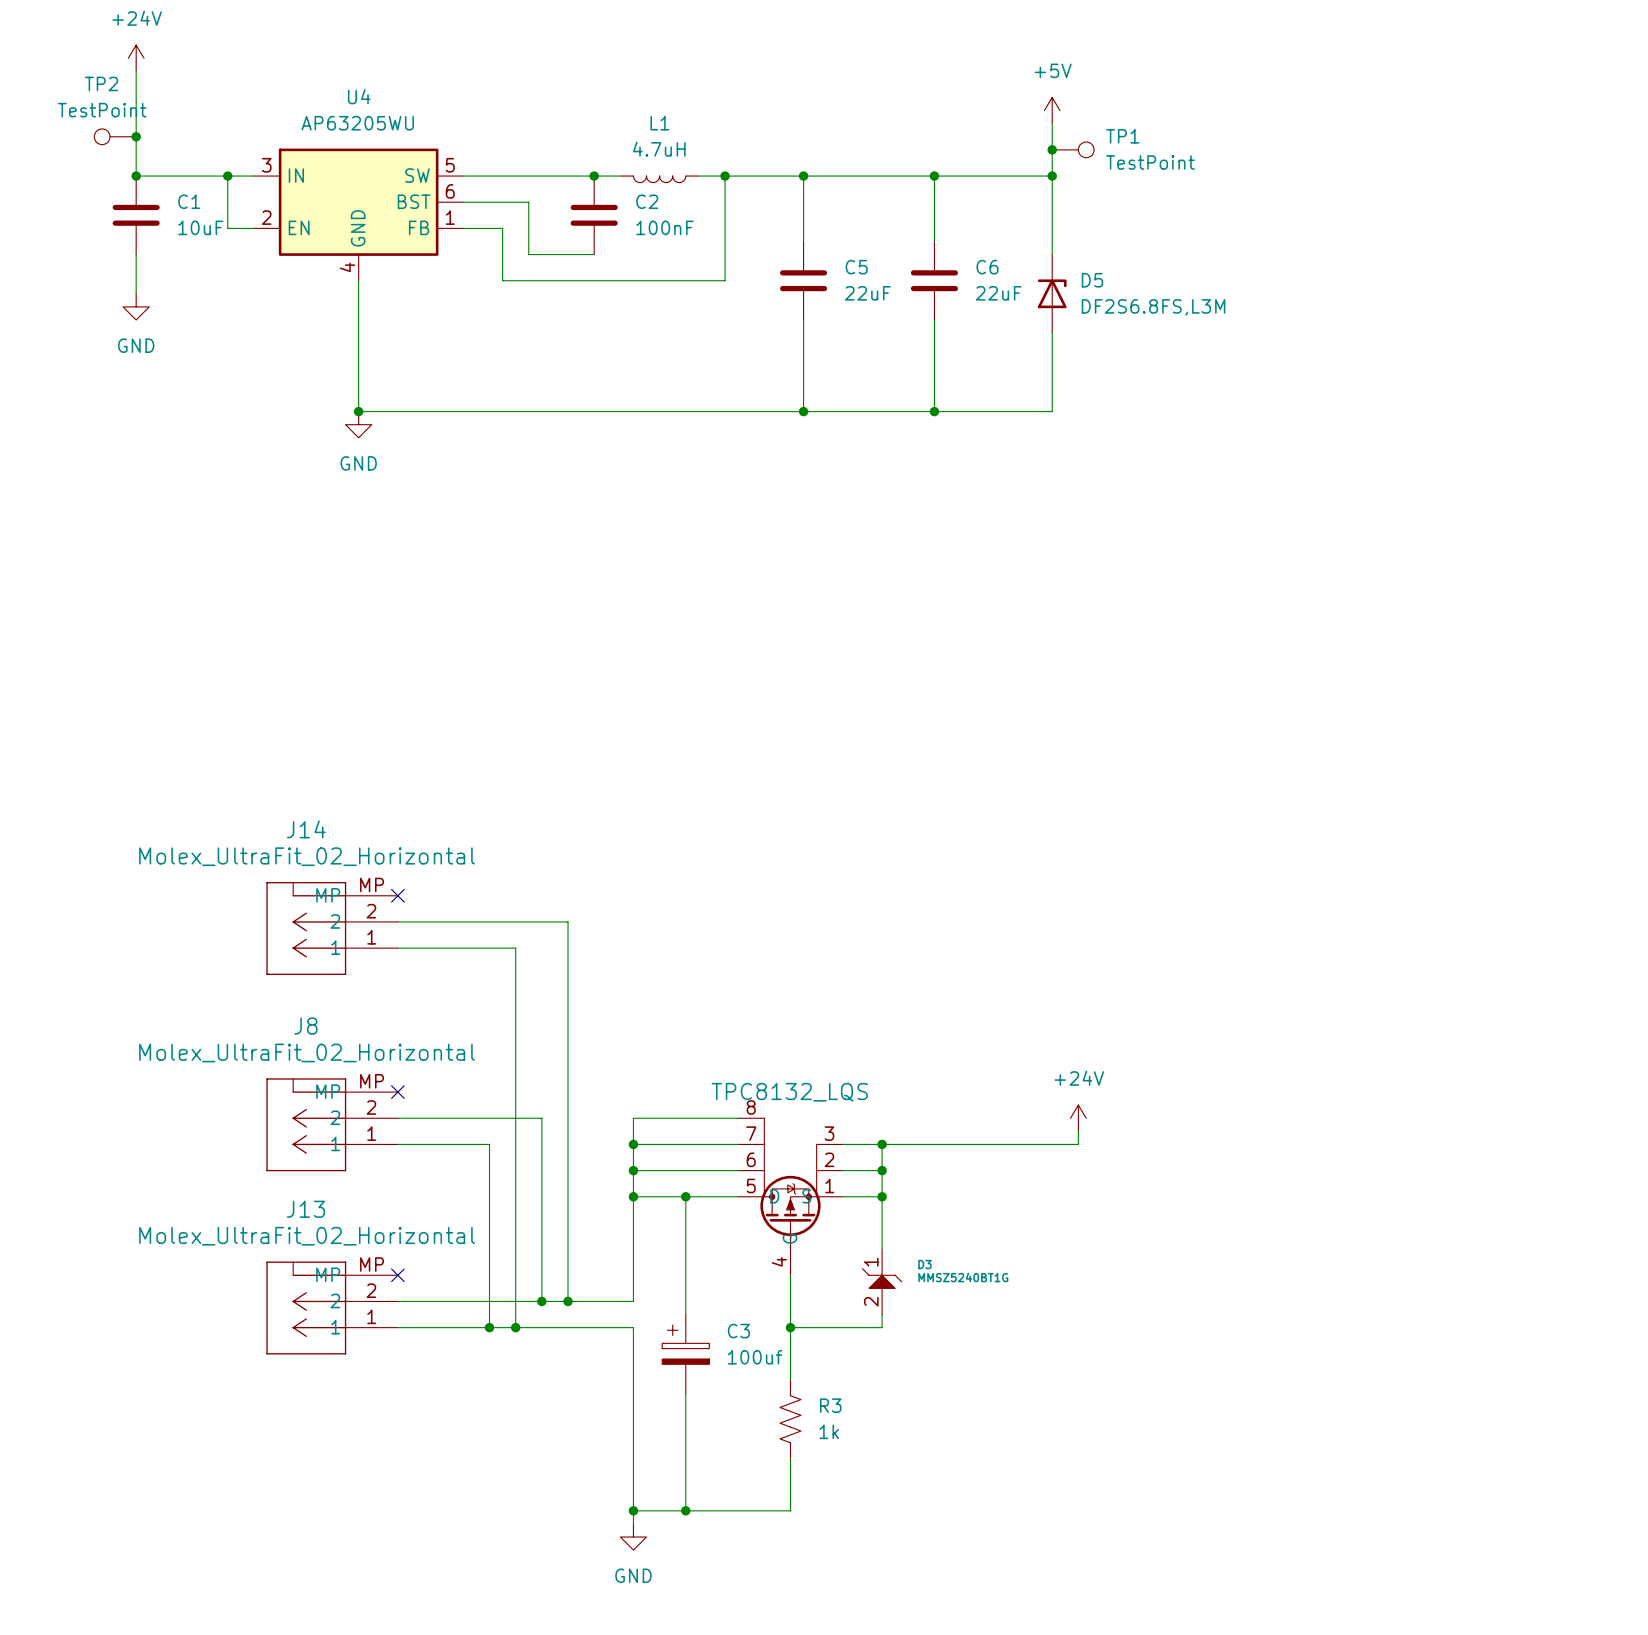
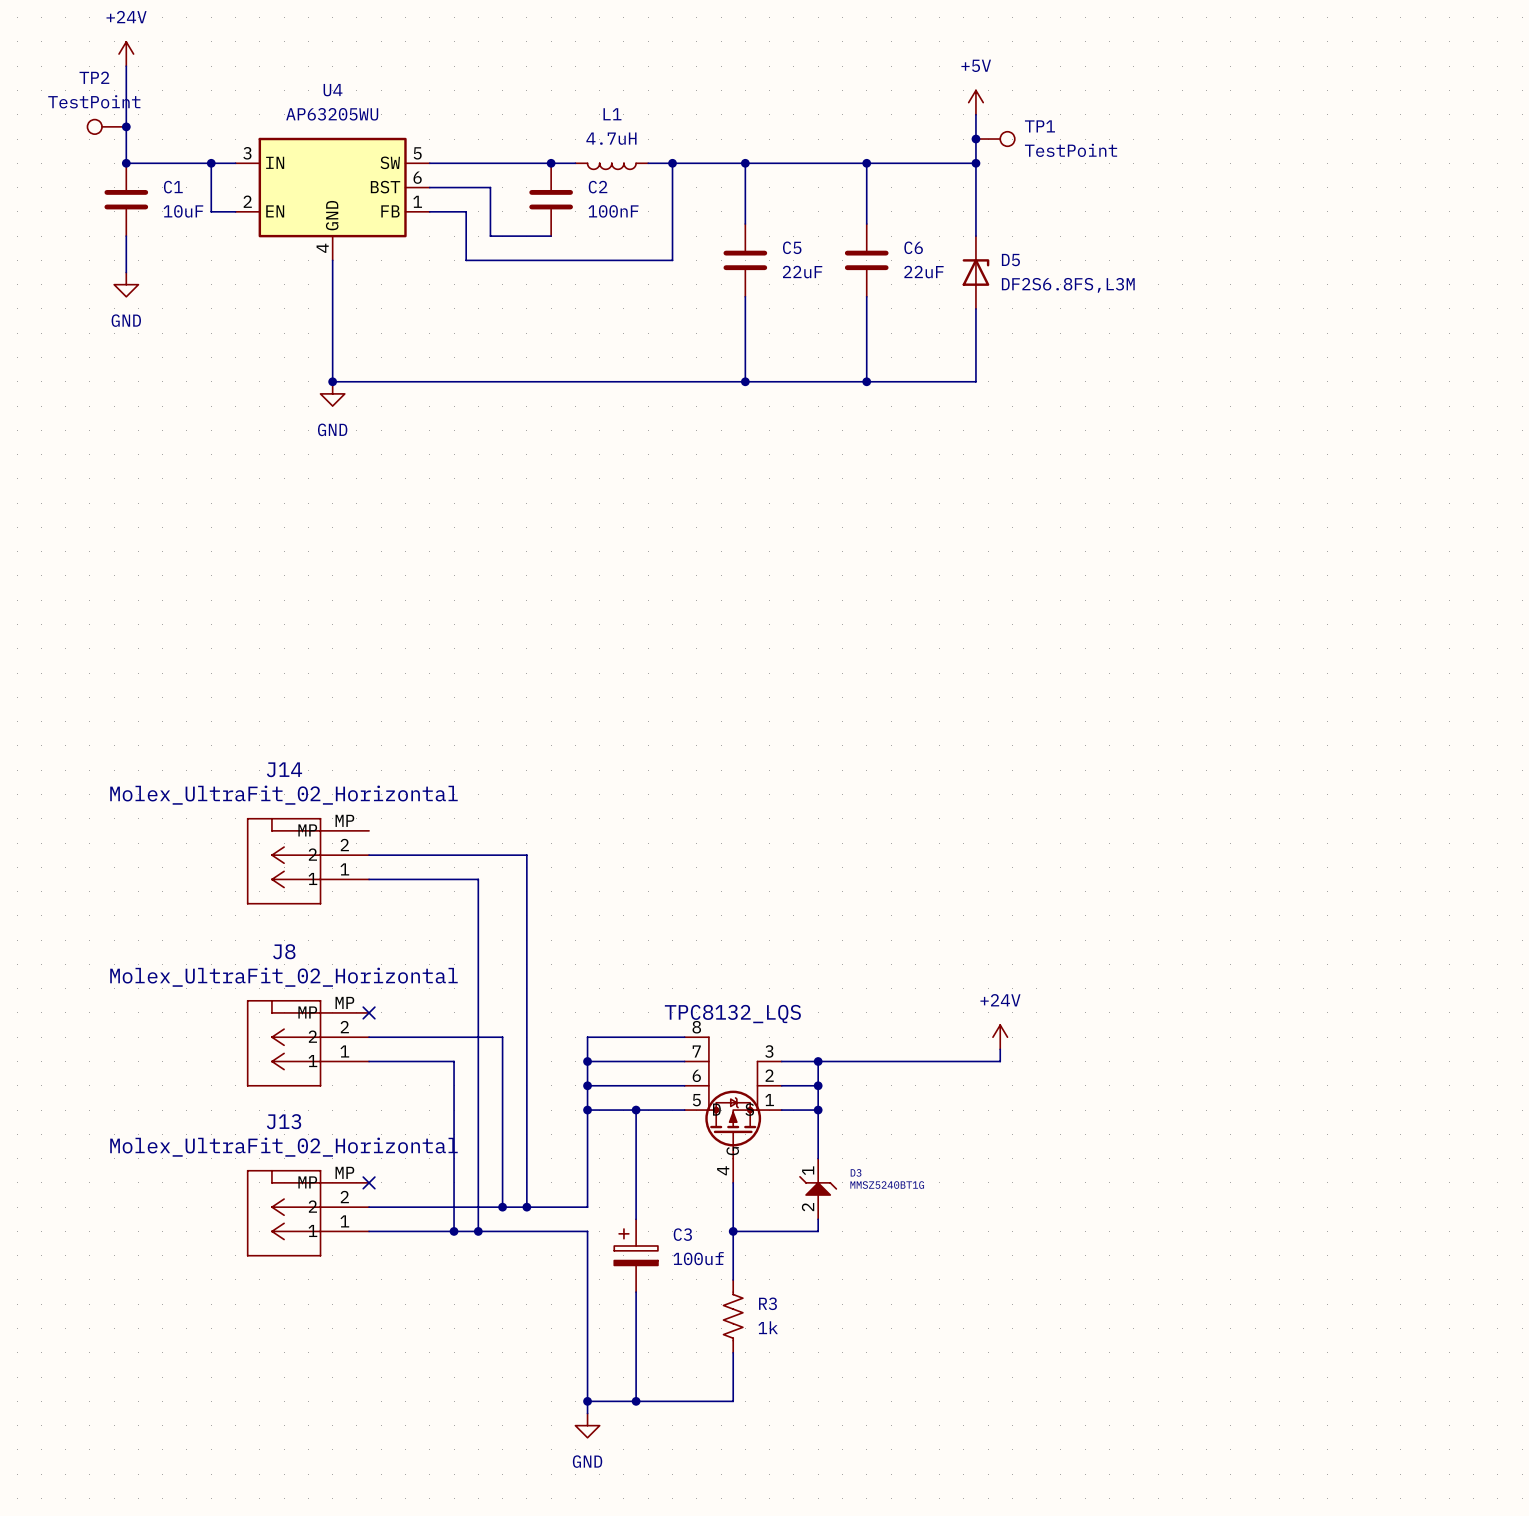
no-connect mark: (397, 895) -> none

